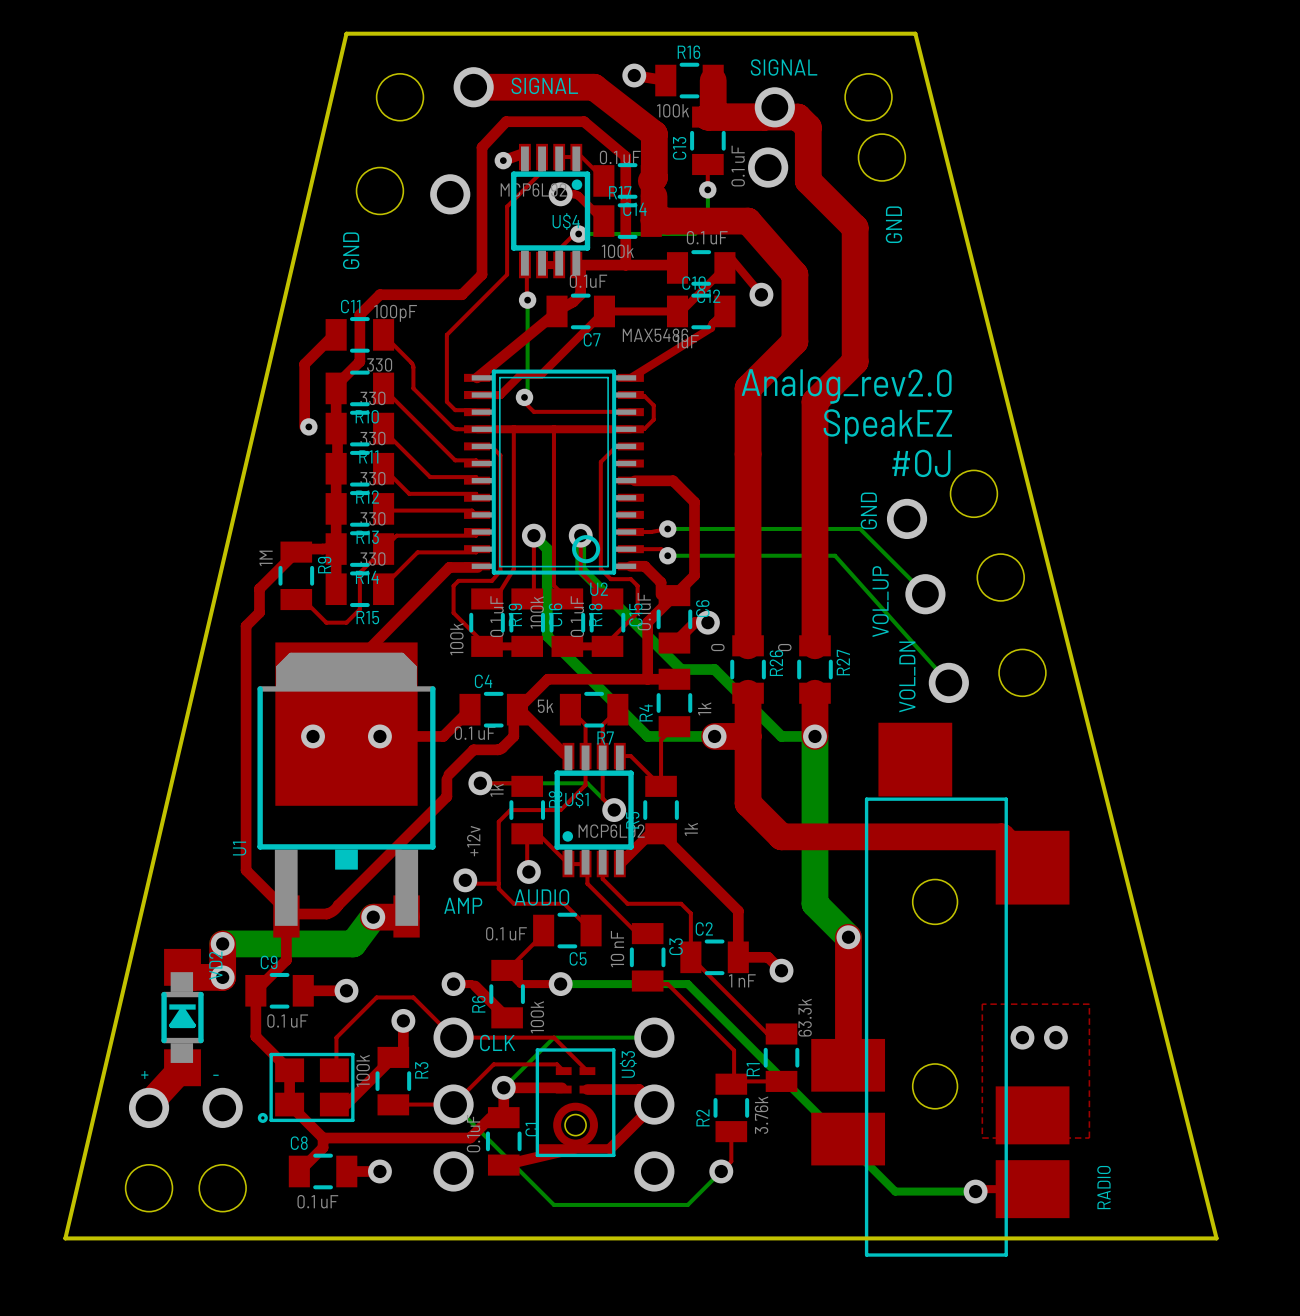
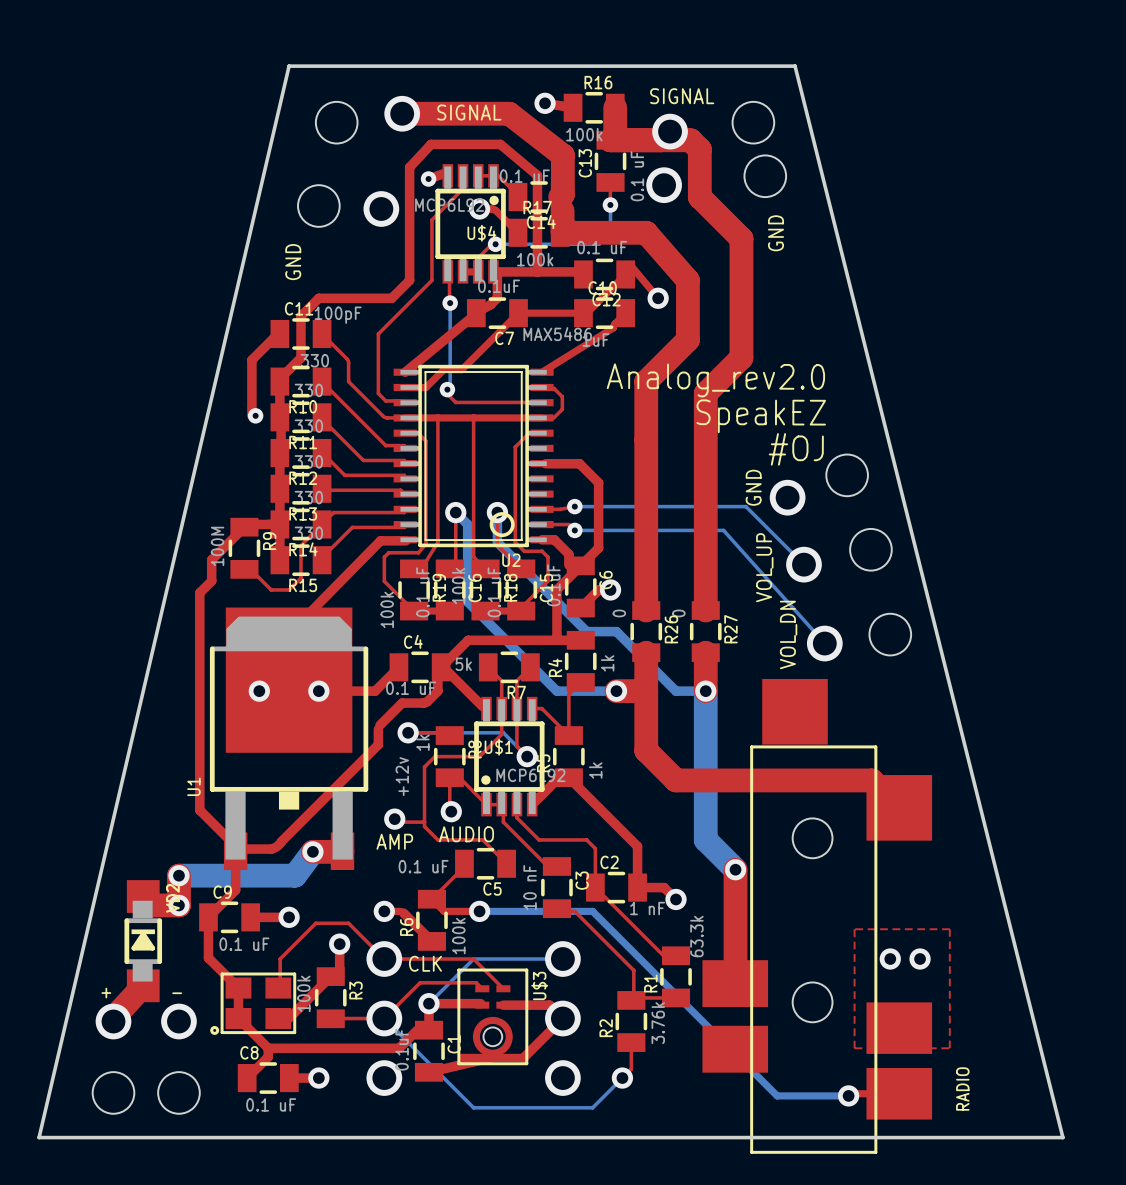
R9 value: 1M (266, 558) -> 100M (217, 546)

